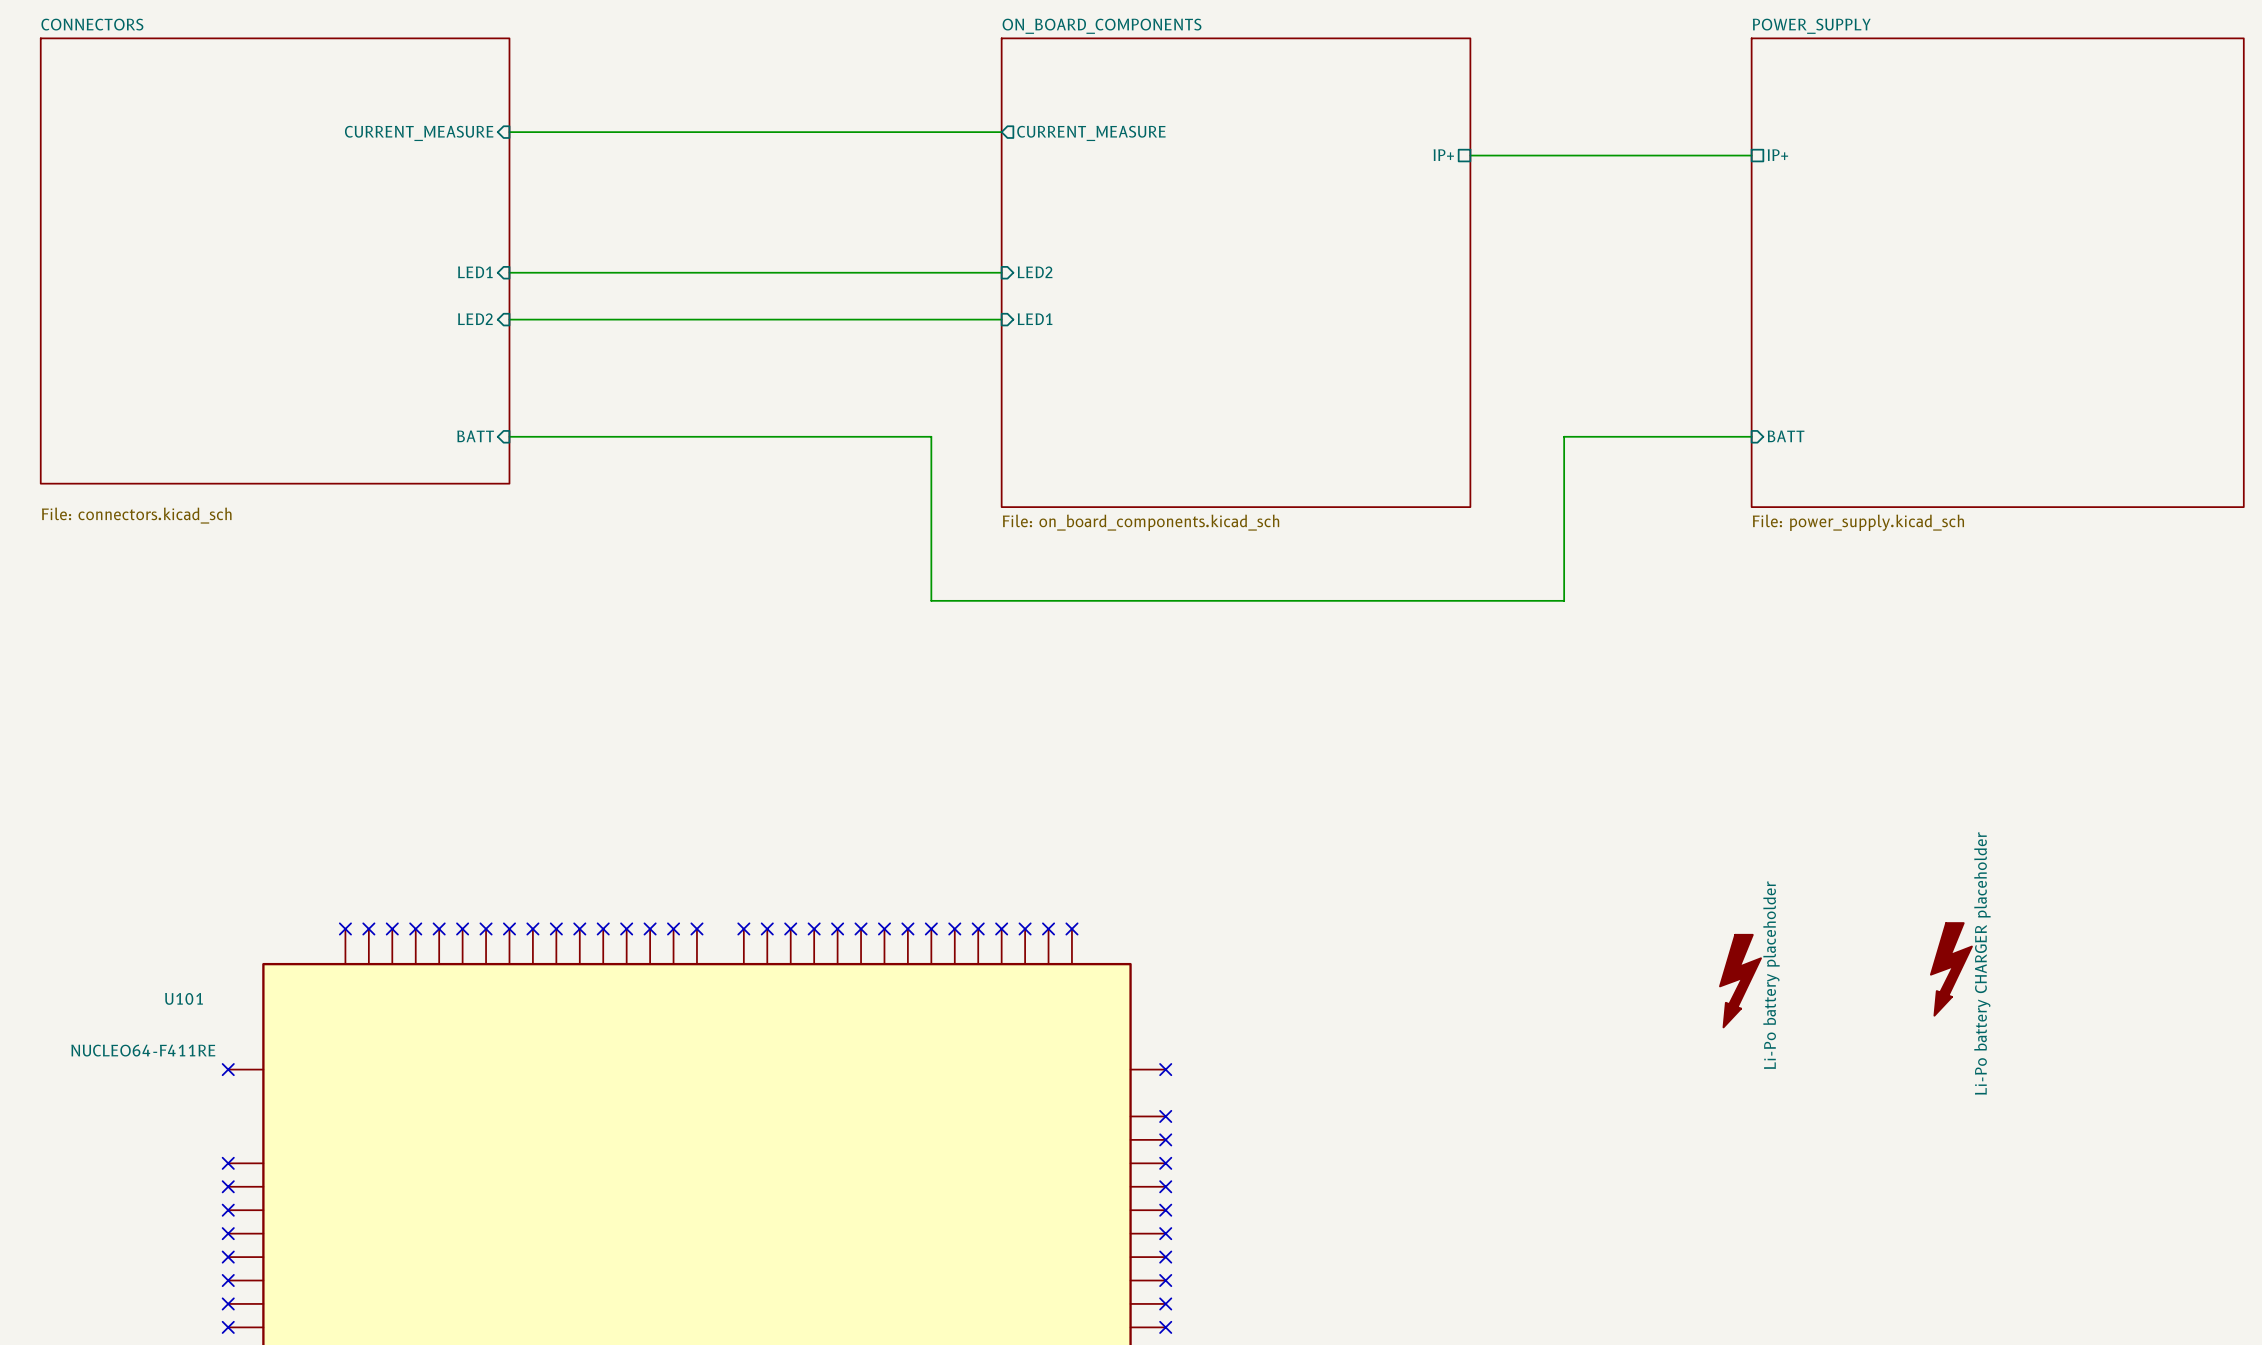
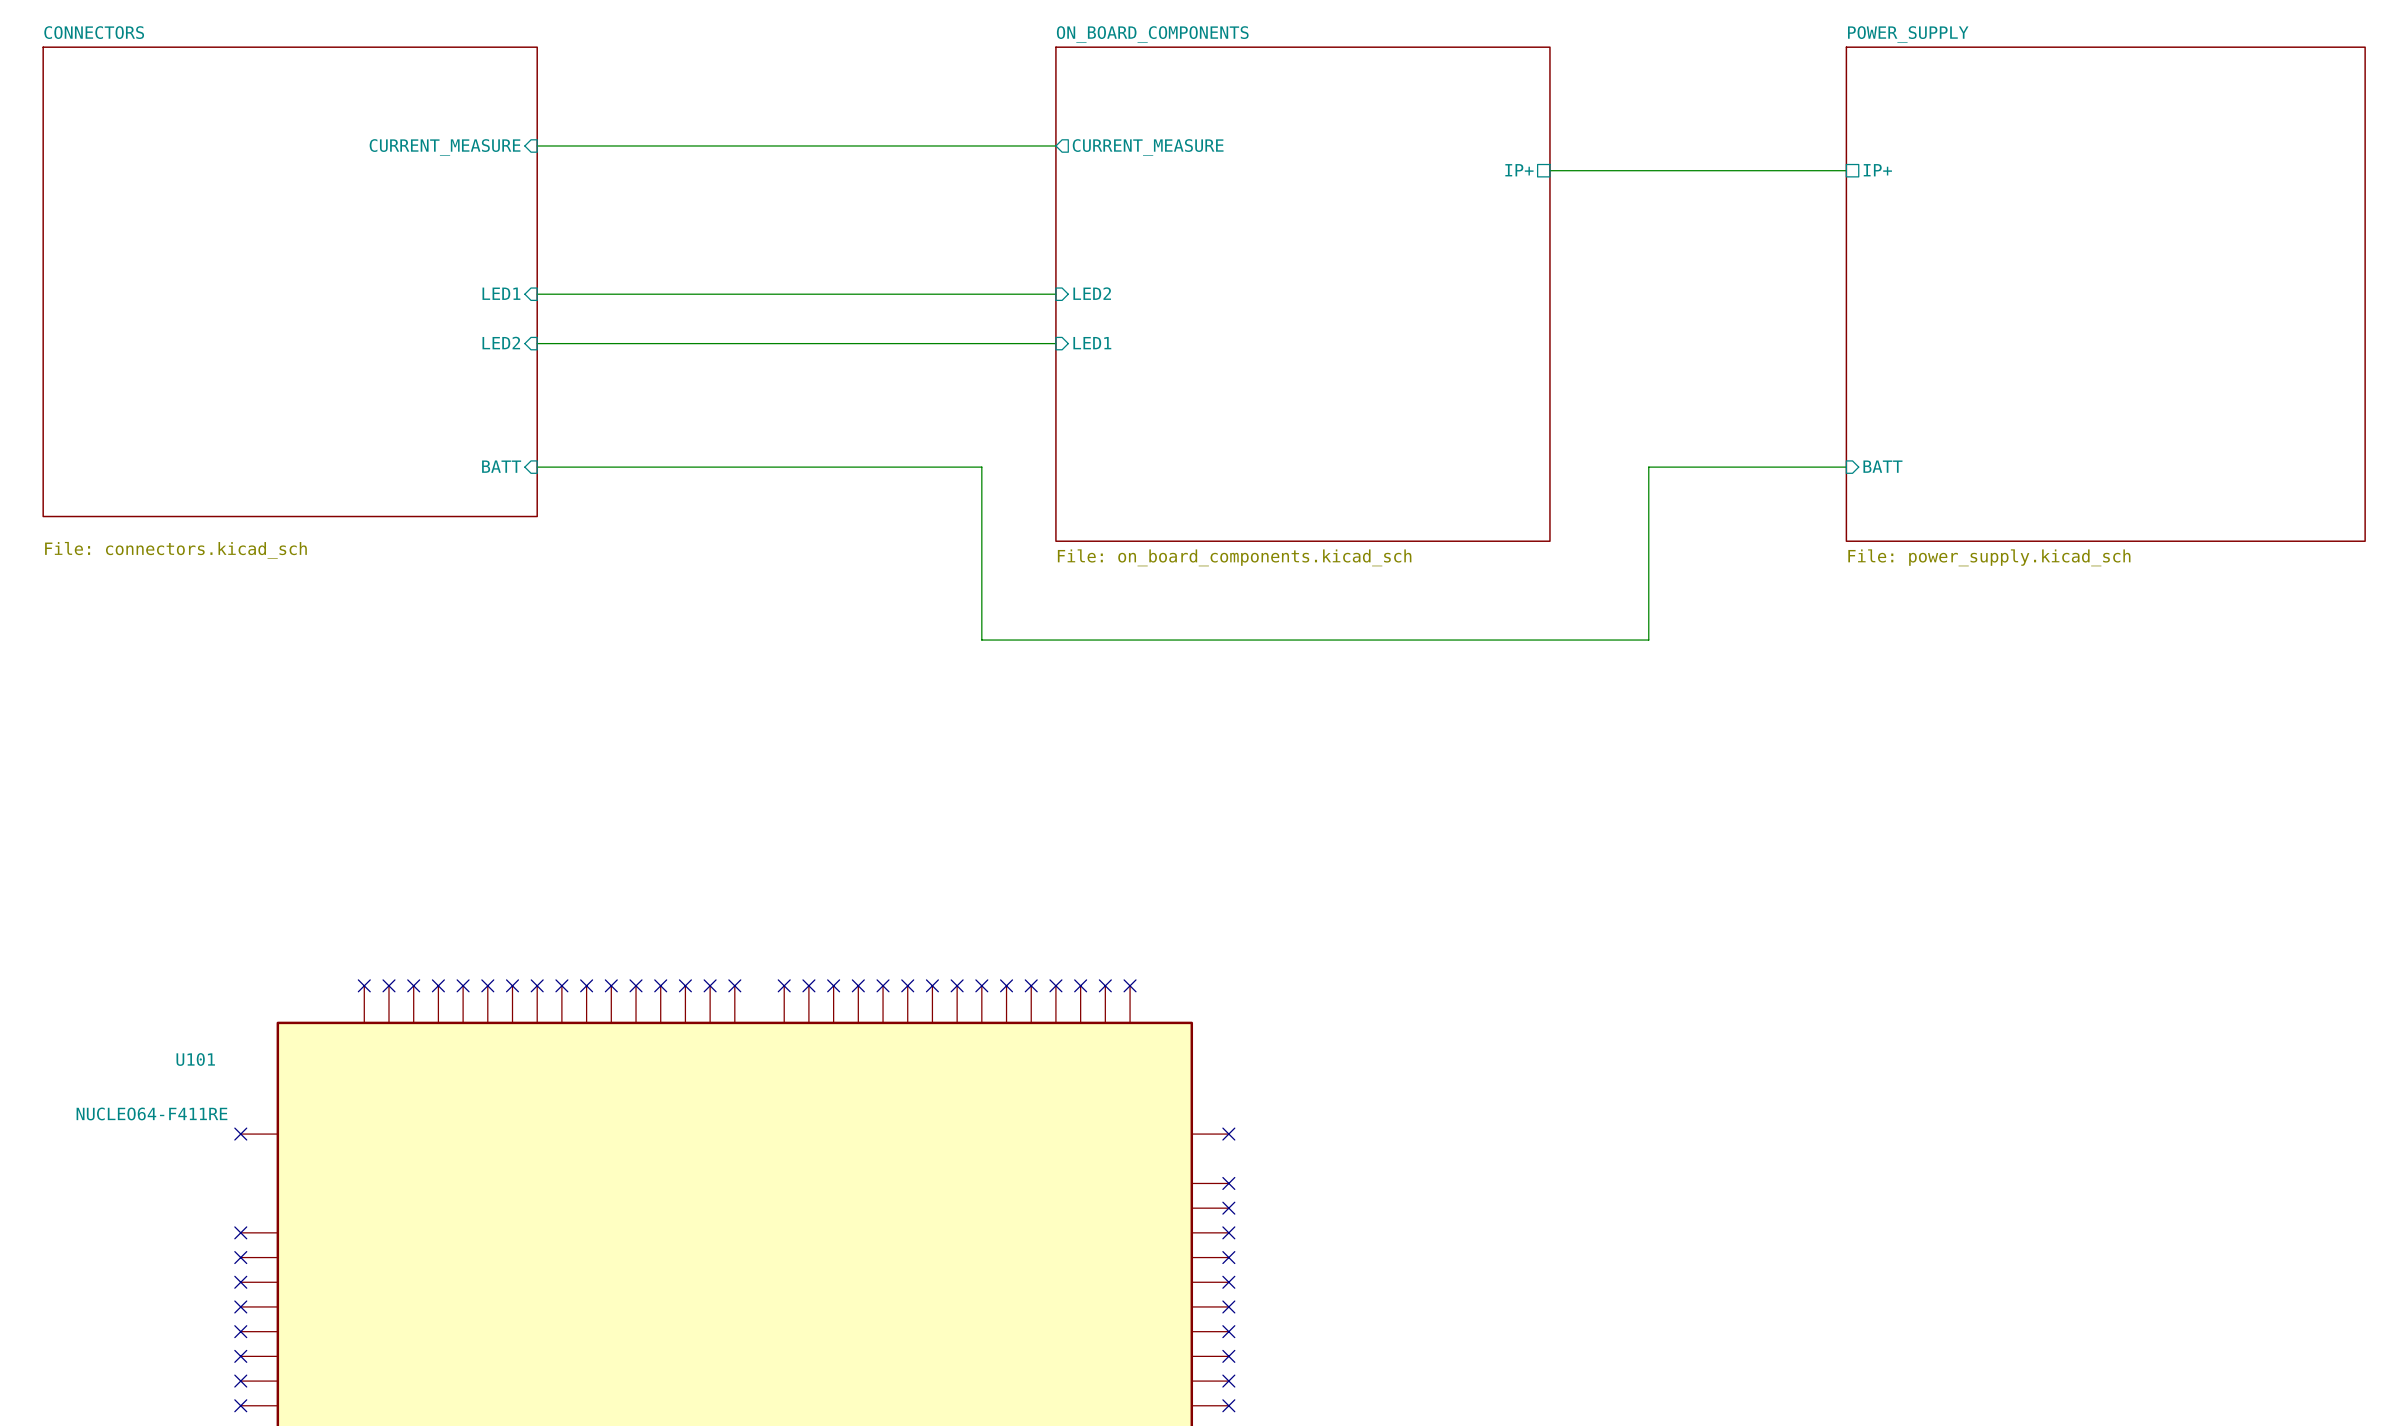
part: Li-Po battery CHARGER placeholder (1951, 969) -> none
part: Li-Po battery placeholder (1740, 981) -> none

